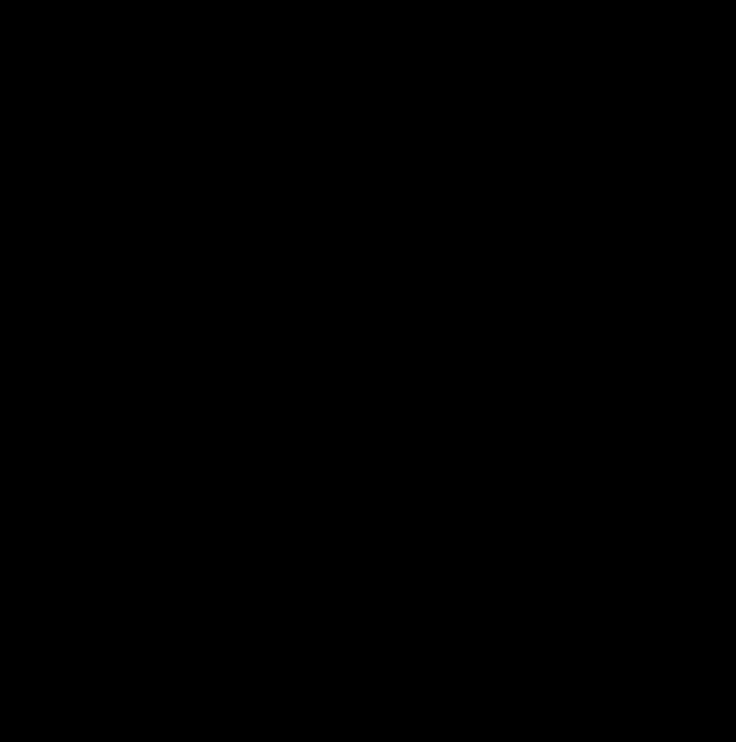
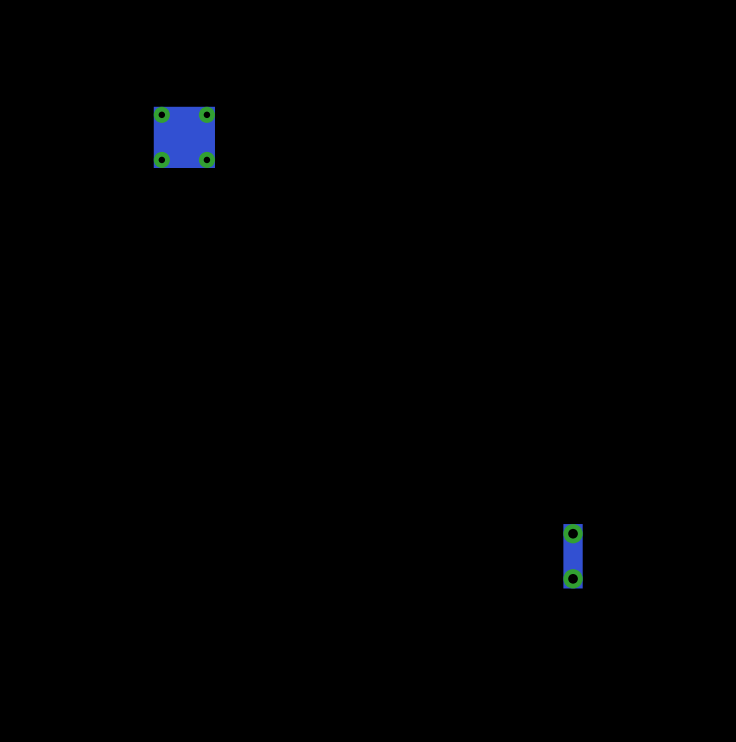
part: none -> (184, 137)
part: none -> (573, 556)

